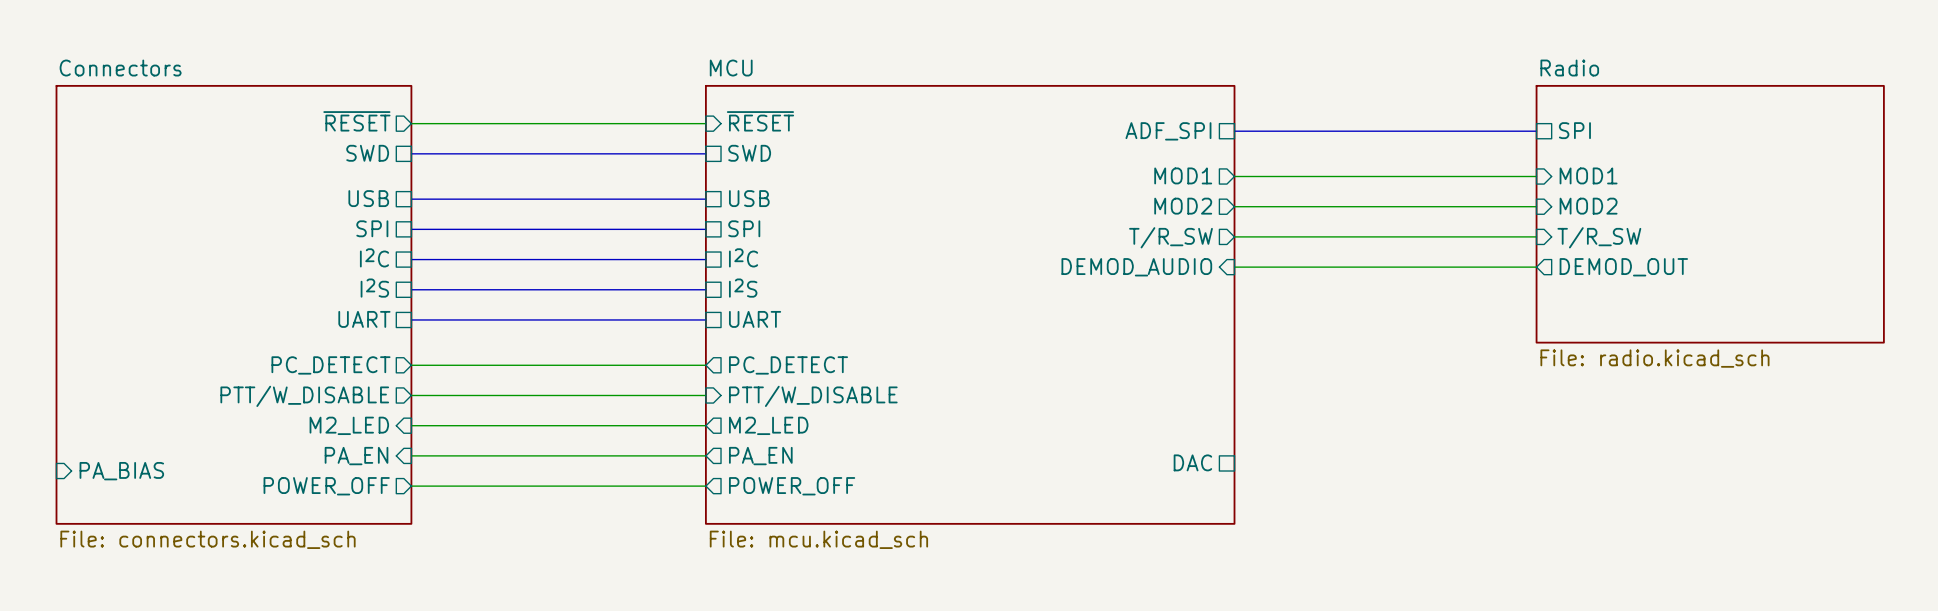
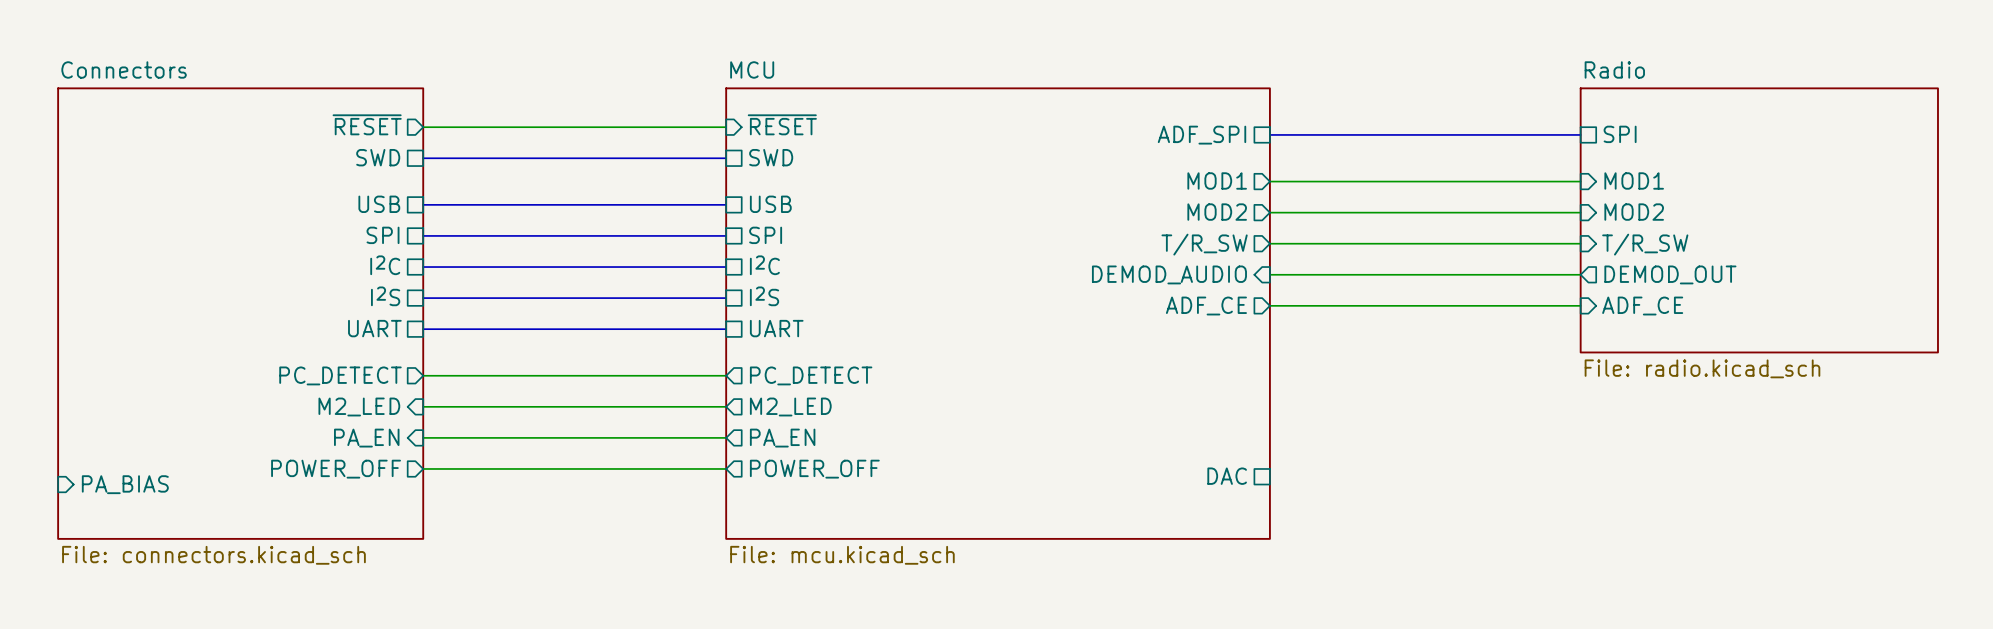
sheet pin: none -> ADF_CE (1206, 306)
wire: none -> (1269, 305) (1580, 305)
sheet pin: none -> ADF_CE (1642, 306)
sheet pin shape: output (304, 396) -> input (359, 407)
sheet pin: PTT/W_DISABLE (304, 396) -> M2_LED (359, 407)
sheet pin shape: input (813, 396) -> output (790, 407)
sheet pin: PTT/W_DISABLE (813, 396) -> M2_LED (790, 407)
sheet pin: M2_LED (349, 425) -> PA_EN (366, 438)
sheet pin: M2_LED (768, 425) -> PA_EN (782, 438)
sheet pin shape: input (356, 456) -> output (336, 469)
sheet pin: PA_EN (356, 456) -> POWER_OFF (336, 469)
sheet pin: PA_EN (760, 456) -> POWER_OFF (814, 469)
sheet pin: POWER_OFF (326, 486) -> none
wire: (411, 486) (705, 486) -> none
sheet pin: POWER_OFF (792, 486) -> none

